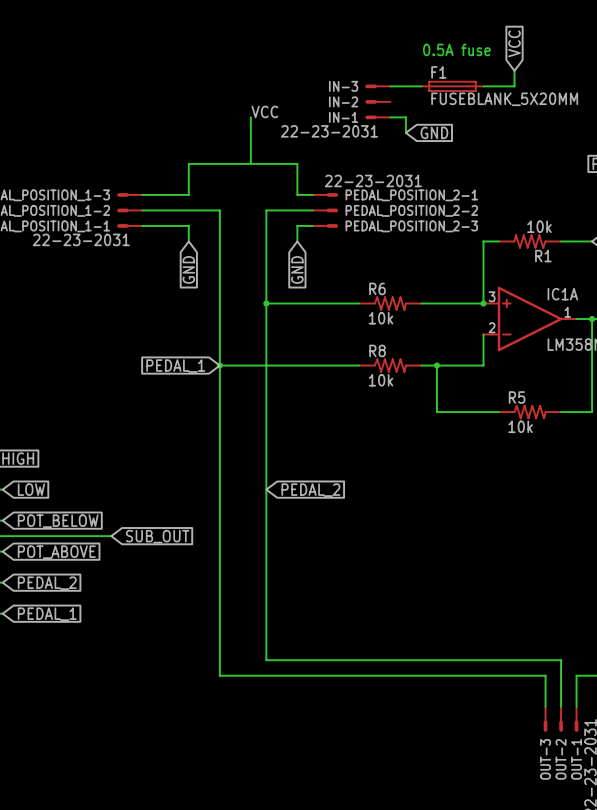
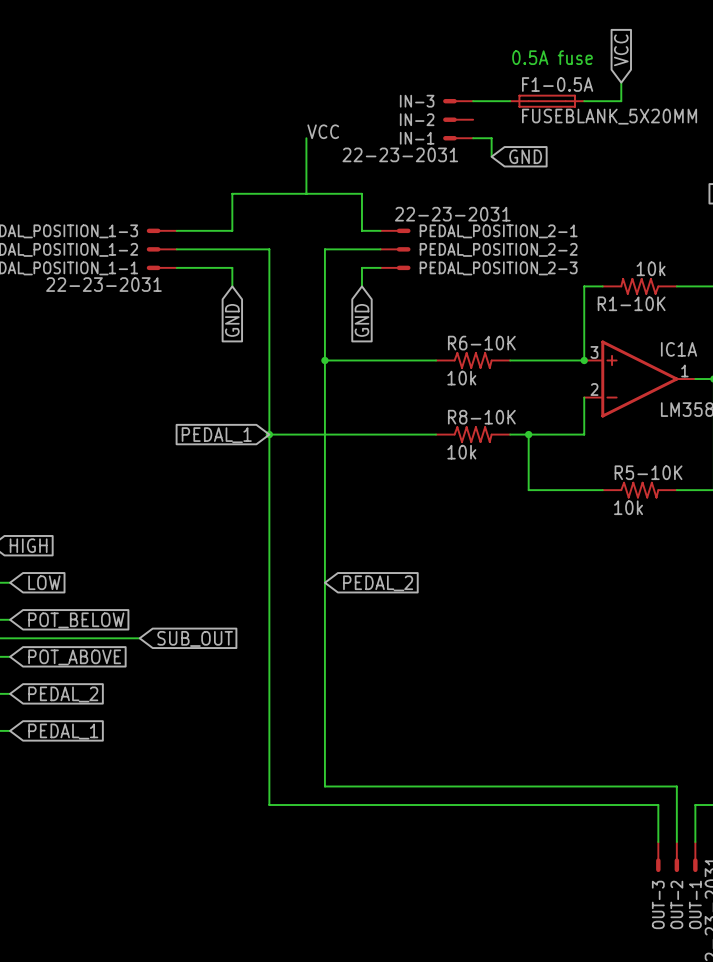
F1 name: F1 (438, 72) -> F1-0.5A (557, 84)
R1 name: R1 (543, 256) -> R1-10K (631, 303)
R6 name: R6 (377, 288) -> R6-10K (481, 343)
R8 name: R8 (377, 350) -> R8-10K (481, 417)
R5 name: R5 (517, 397) -> R5-10K (648, 472)

